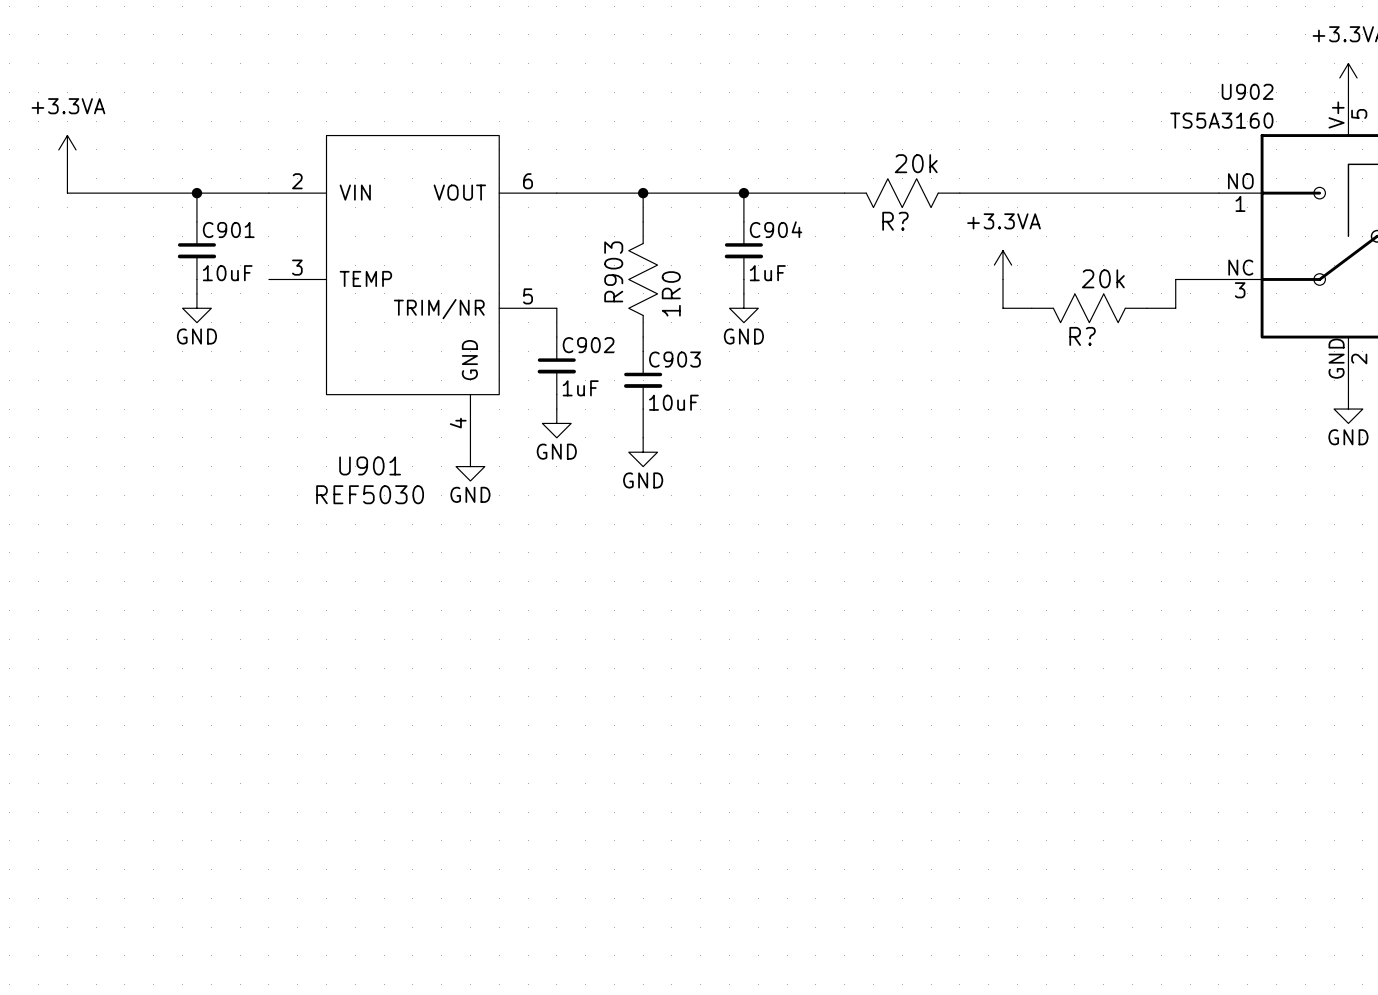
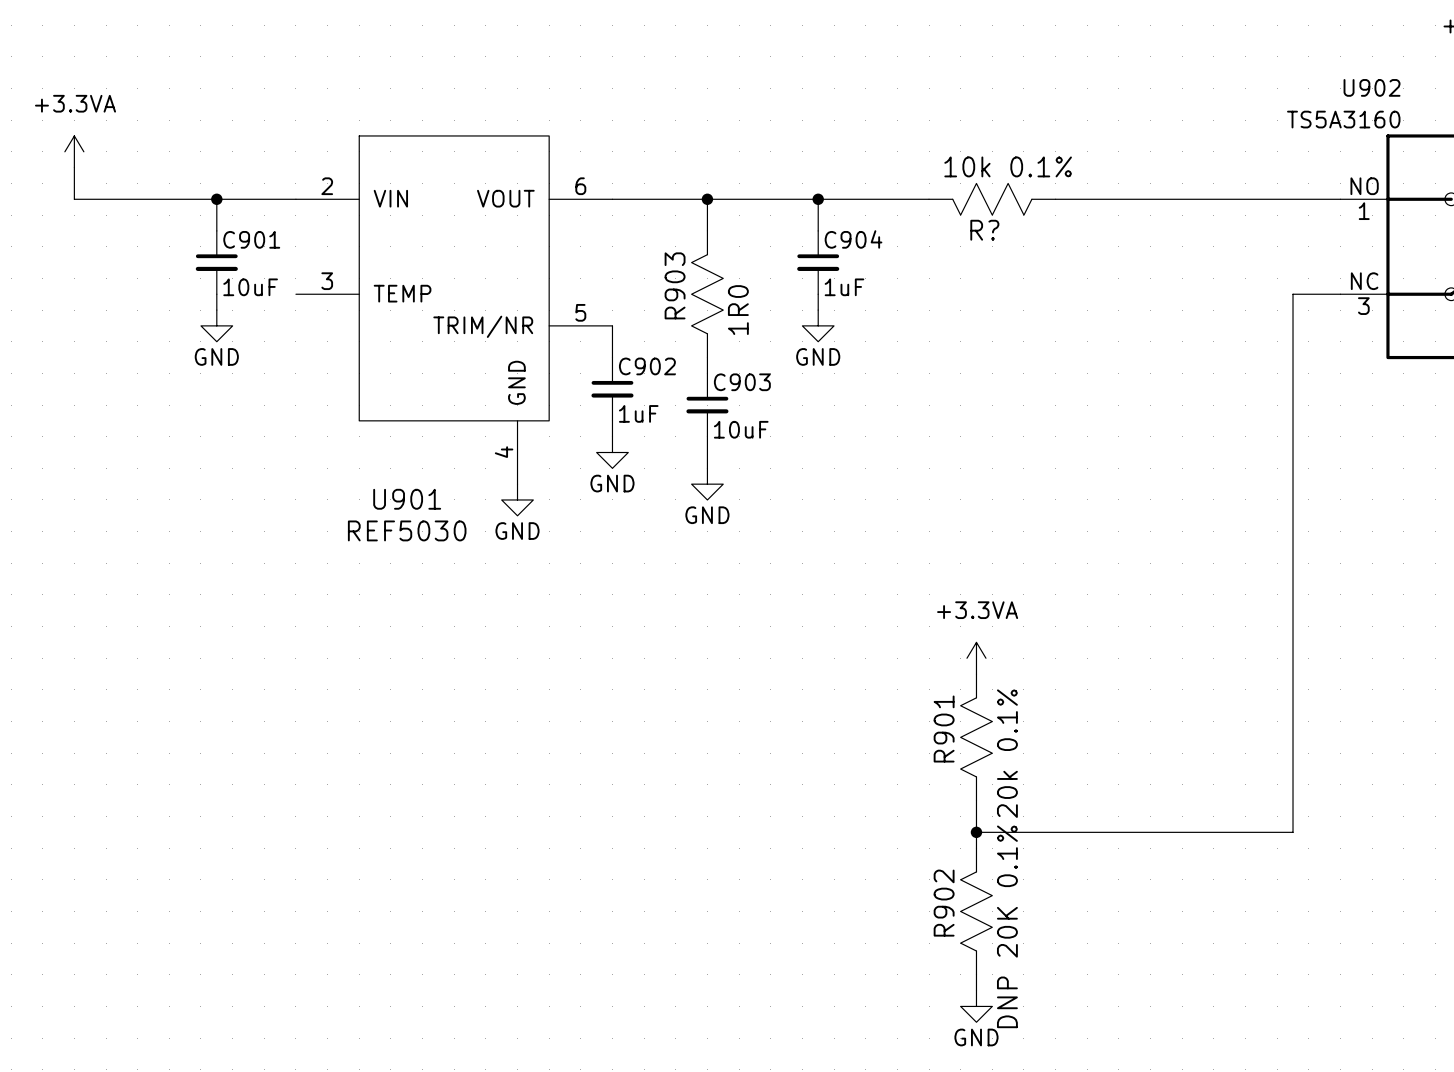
R? value: 20k (916, 163) -> 10k 0.1% (1008, 166)
power symbol: +3.3VA (1003, 265) -> none
wire: (1003, 279) (1003, 308) (1031, 308) -> none
R?: 20k (1089, 308) -> none
wire: (1146, 308) (1175, 308) -> (976, 832) (1293, 832) (1293, 325)
power symbol: none -> +3.3VA (976, 658)
R901: none -> 20k 0.1% (976, 737)
wire: none -> (976, 800) (976, 848)
junction: none -> (976, 832)
R902: none -> DNP 20K 0.1% (976, 911)
wire: none -> (976, 974) (976, 990)
power symbol: none -> GND (976, 1006)

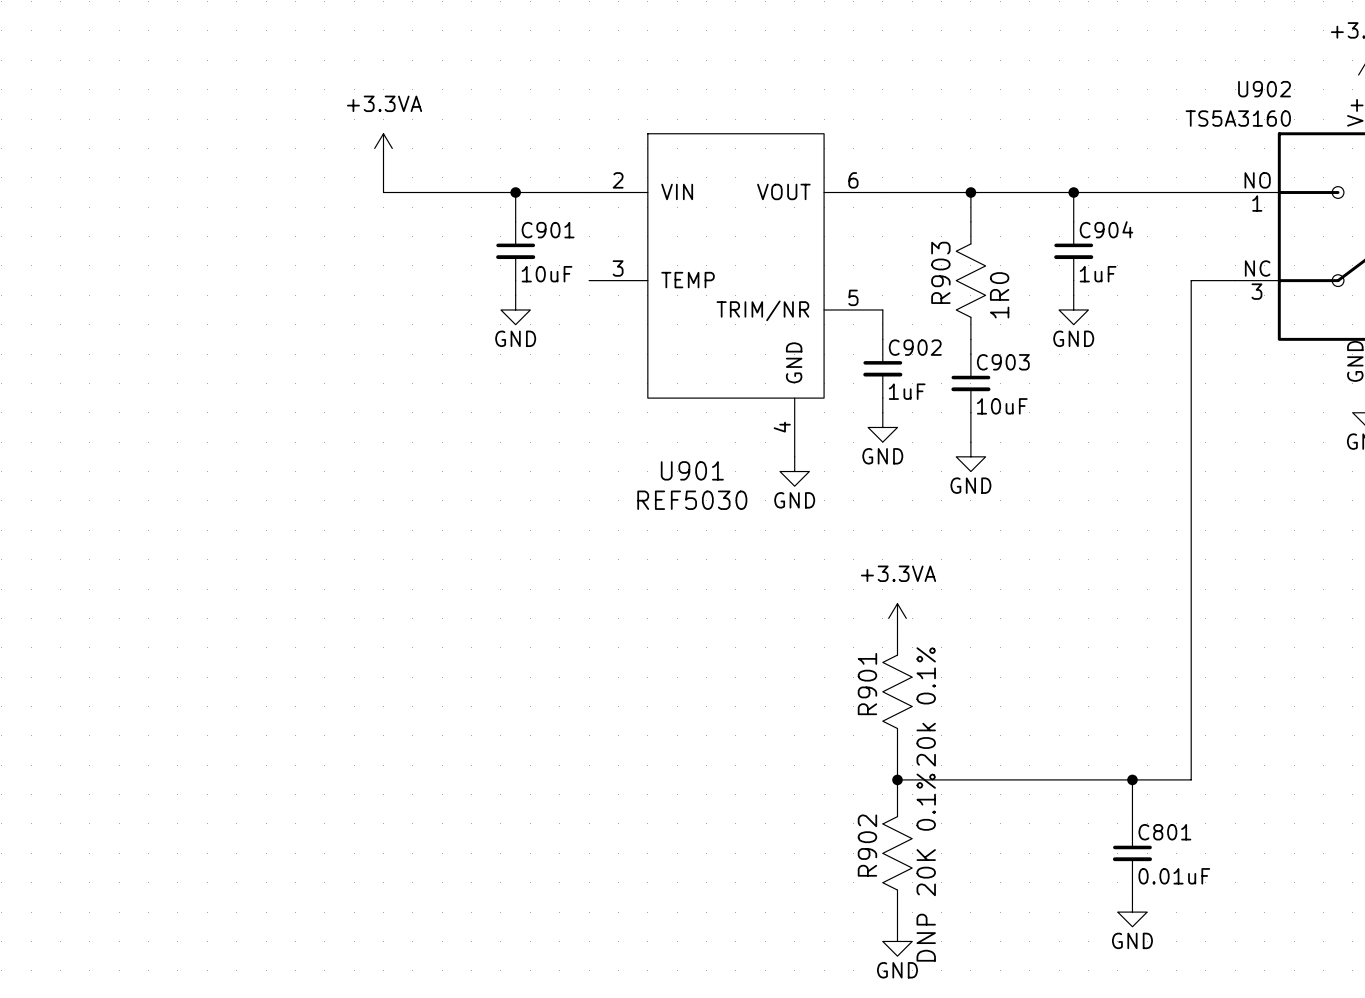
power symbol: +3.3VA (74, 151) -> none
power symbol: none -> +3.3VA (383, 148)
wire: (74, 167) (74, 199) (295, 199) -> none
wire: none -> (383, 163) (383, 192) (559, 192)
wire: (216, 199) (216, 230) -> none
junction: (216, 199) -> none
junction: none -> (515, 192)
wire: (644, 199) (929, 199) -> none
junction: (707, 199) -> none
wire: (818, 199) (818, 230) -> (882, 309) (882, 339)
junction: (818, 199) -> none
wire: none -> (882, 192) (970, 192) (970, 221)
R?: 10k 0.1% (992, 199) -> none
junction: none -> (970, 192)
wire: none -> (1073, 192) (1073, 221)
junction: none -> (1073, 192)
C901 position: (216, 262) -> (515, 251)
C904 position: (818, 262) -> (1073, 251)
wire: (216, 294) (216, 310) -> none
R903 position: (707, 294) -> (970, 280)
wire: (818, 294) (818, 310) -> (882, 398) (882, 412)
wire: none -> (1073, 280) (1073, 295)
U901 position: (454, 310) -> (735, 295)
power symbol: GND (216, 325) -> none
power symbol: none -> GND (515, 309)
wire: (612, 325) (612, 357) -> (515, 192) (515, 221)
power symbol: GND (818, 325) -> none
power symbol: none -> GND (1073, 309)
wire: none -> (970, 339) (970, 354)
C902 position: (612, 389) -> (882, 368)
C903 position: (707, 405) -> (970, 383)
wire: (612, 420) (612, 436) -> (515, 280) (515, 295)
wire: (707, 436) (707, 468) -> none
wire: none -> (970, 412) (970, 442)
power symbol: GND (612, 452) -> none
power symbol: none -> GND (882, 427)
power symbol: GND (707, 484) -> none
power symbol: none -> GND (970, 456)
power symbol: GND (517, 499) -> none
power symbol: none -> GND (794, 471)
wire: none -> (1132, 779) (1132, 823)
junction: none -> (1132, 779)
C801: none -> 0.01uF (1132, 853)
wire: none -> (1132, 882) (1132, 897)
power symbol: none -> GND (1132, 912)

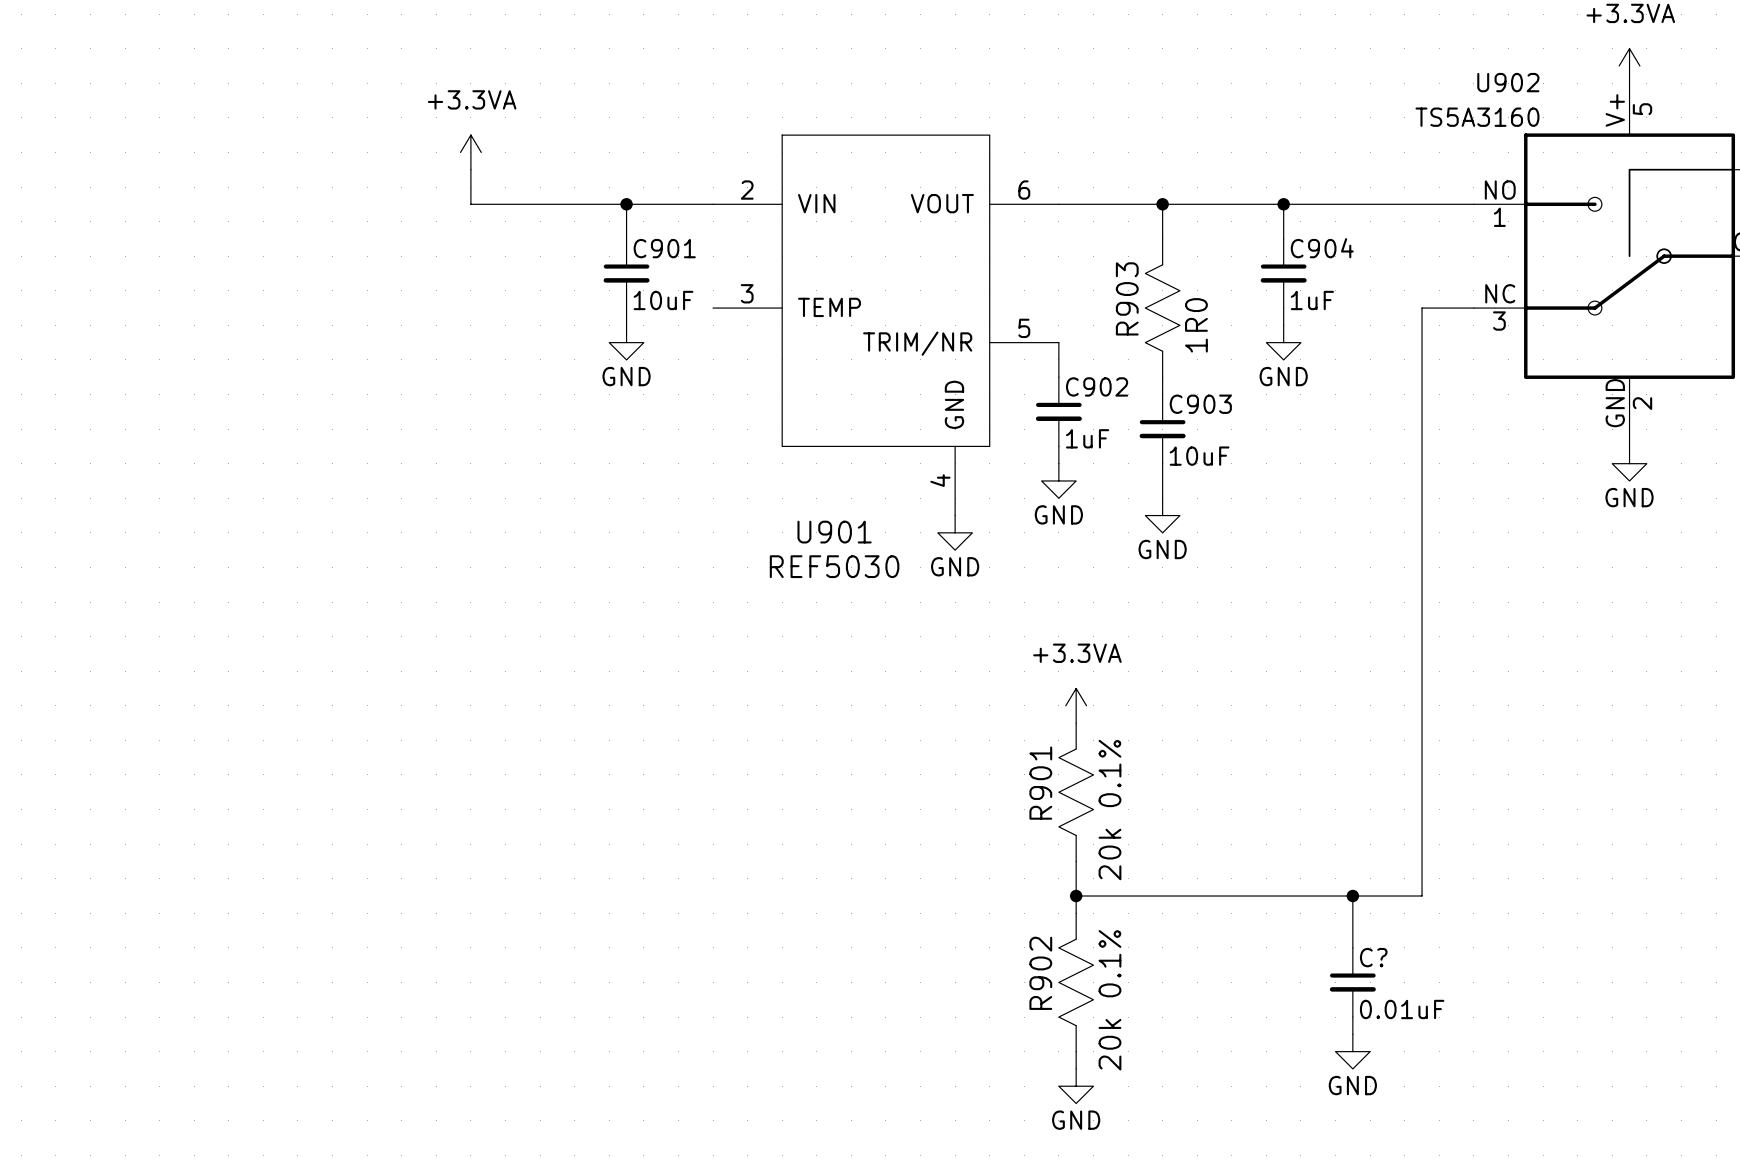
C801 name: C801 (1164, 832) -> C? (1373, 957)
R902 value: DNP 20K 0.1% (926, 867) -> 20k 0.1% (1109, 1000)

